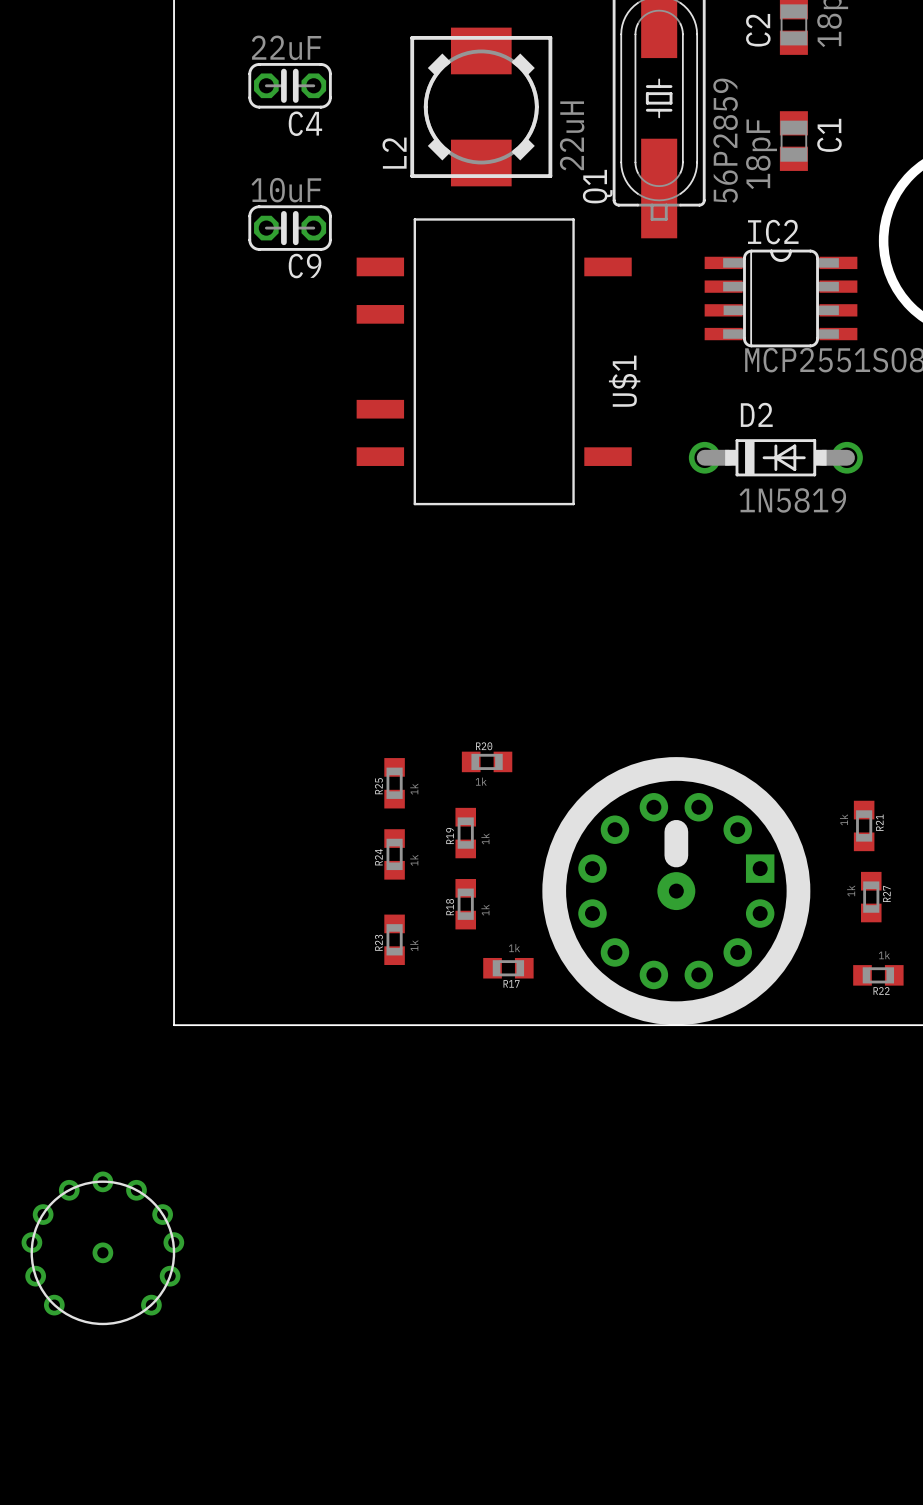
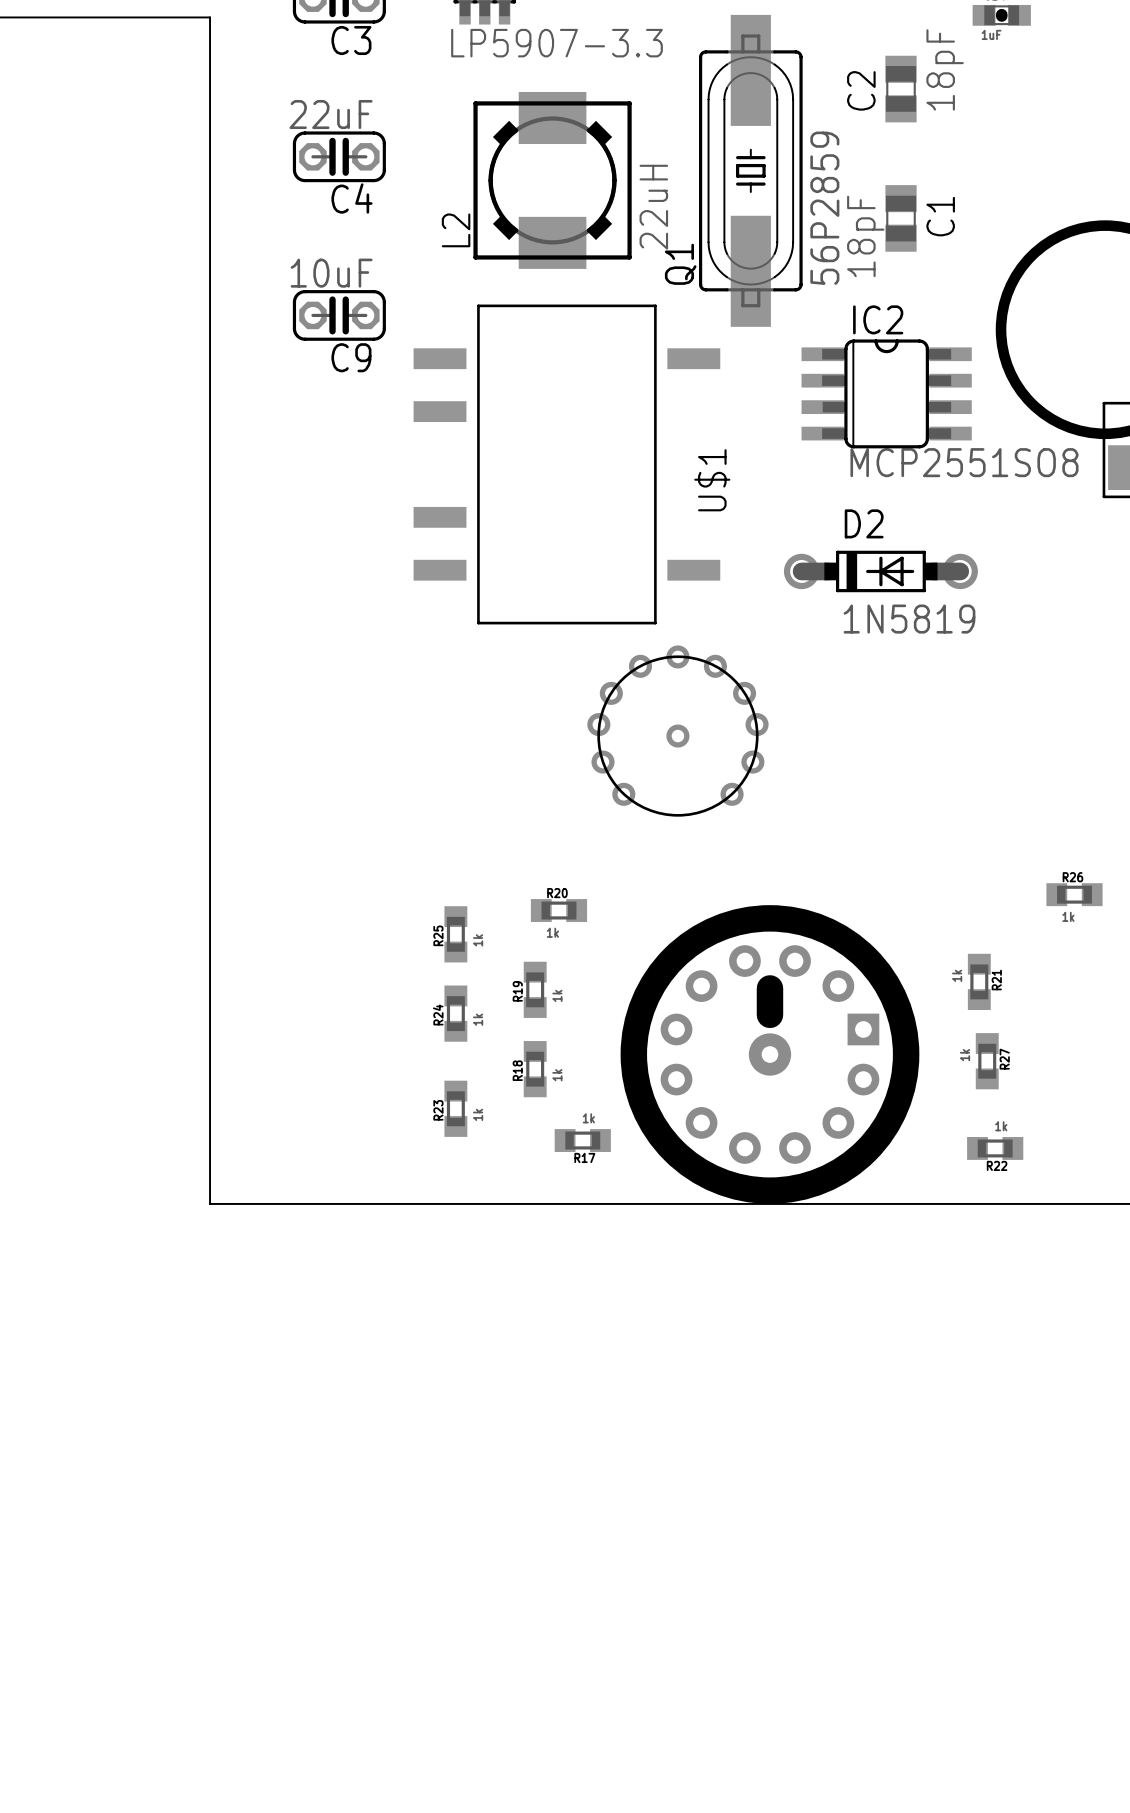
part: none -> (677, 731)
part: (102, 1248) -> none

